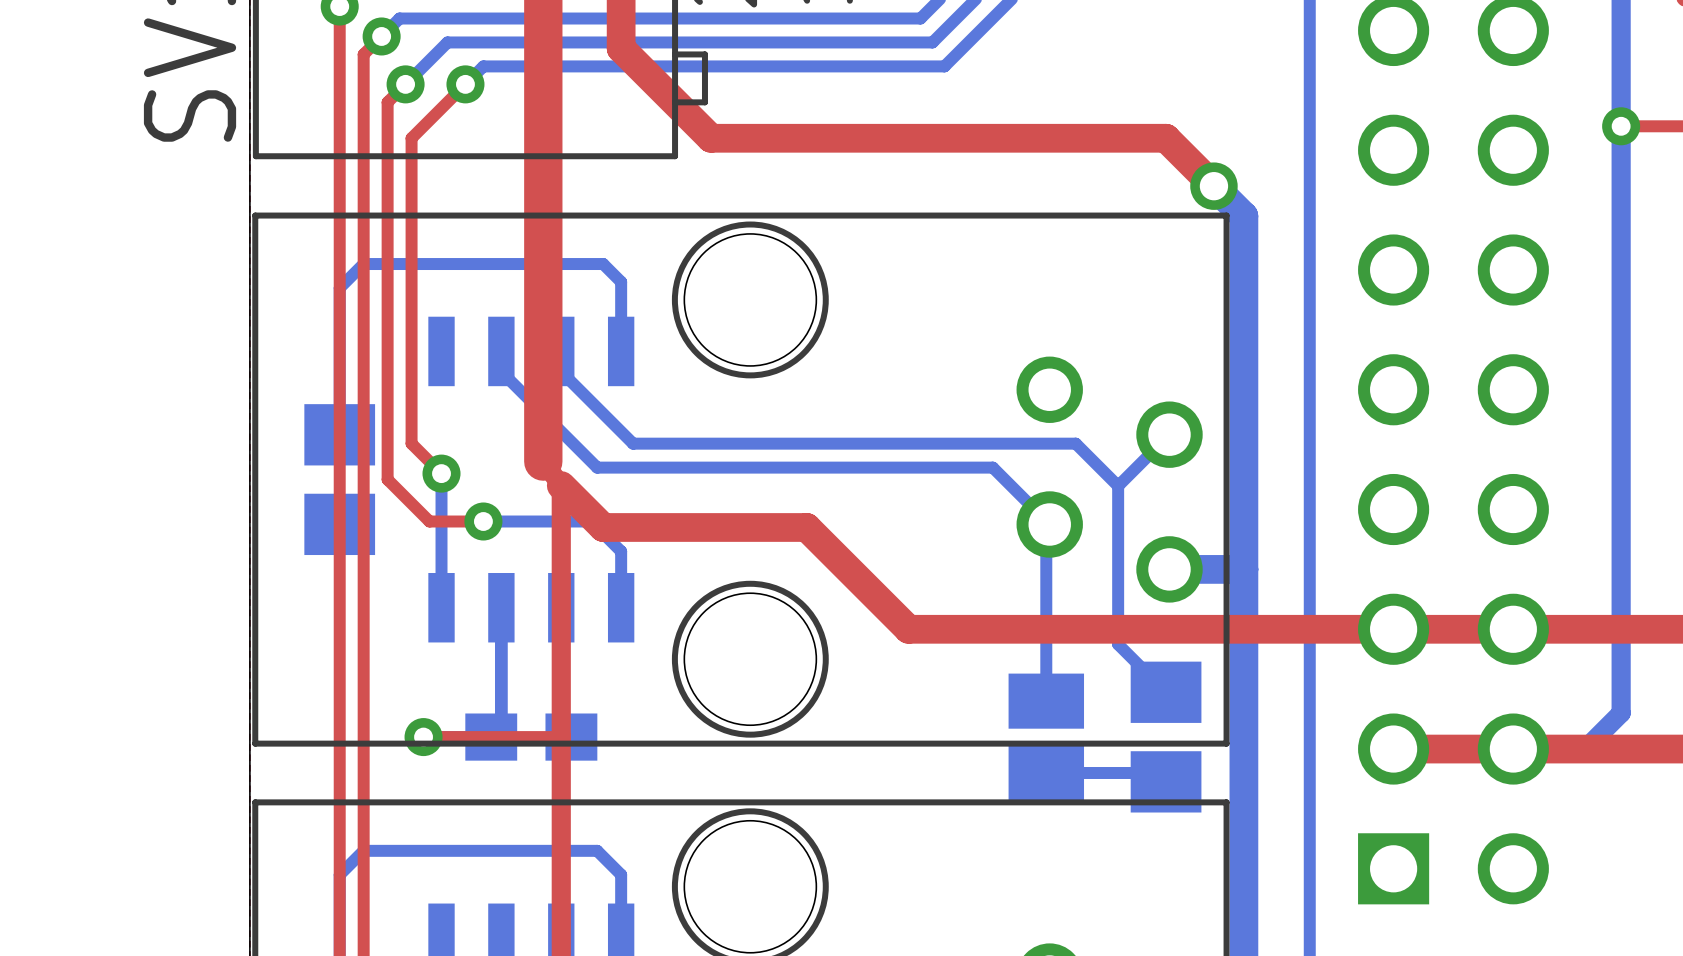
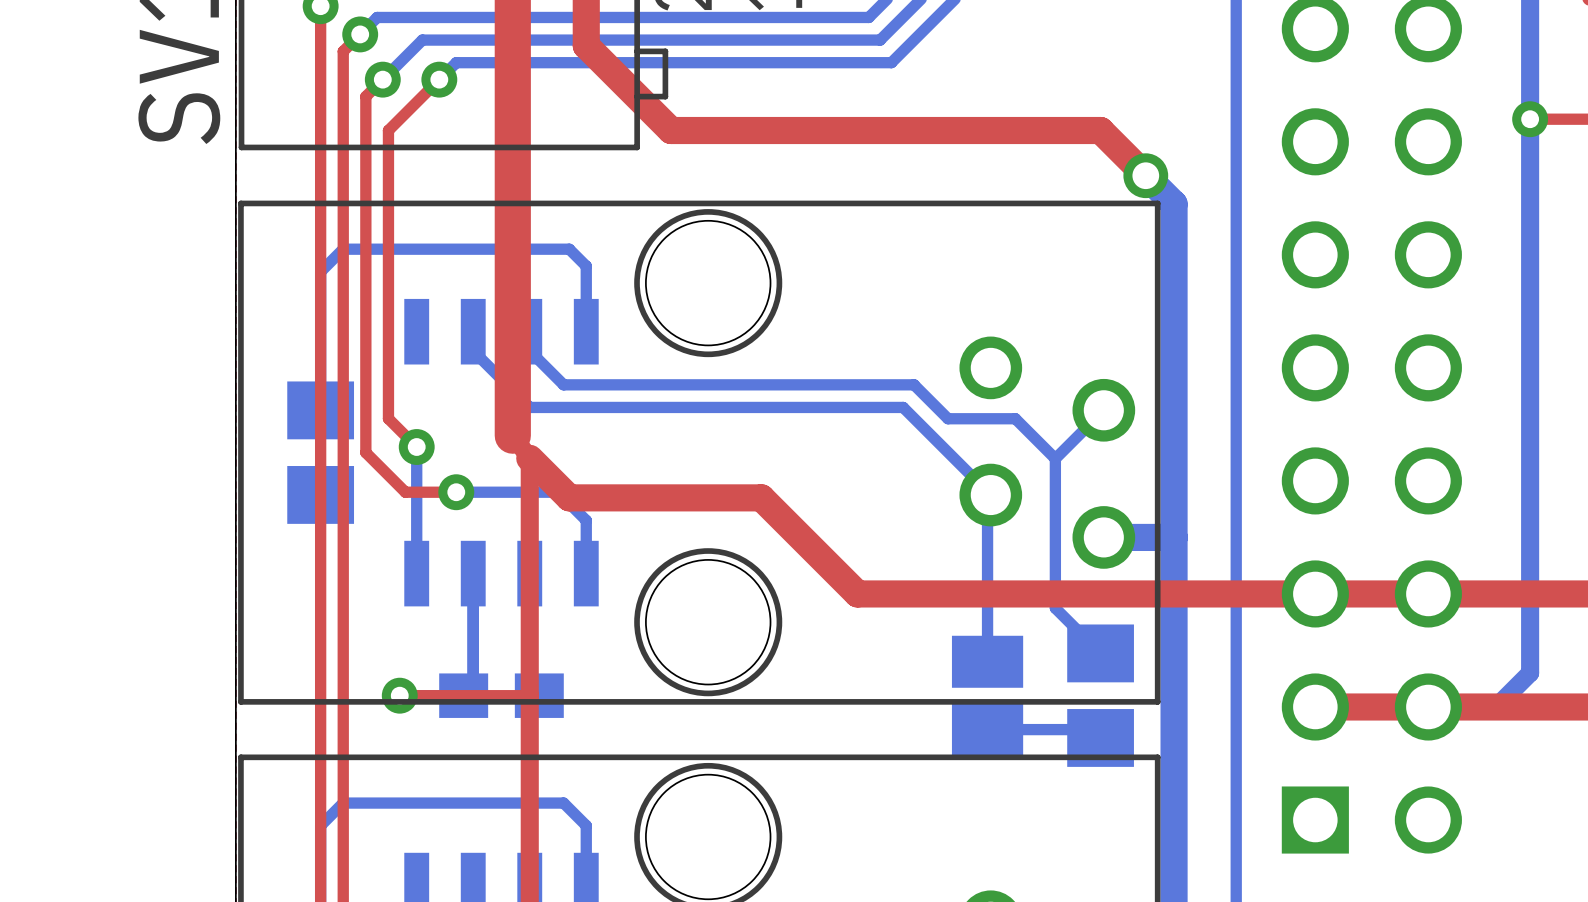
bottom track: (597, 407) (633, 443) (1004, 443) -> (563, 384) (914, 384) (947, 418)
bottom track: (561, 431) (597, 467) (992, 467) -> (529, 407) (903, 407) (937, 441)

